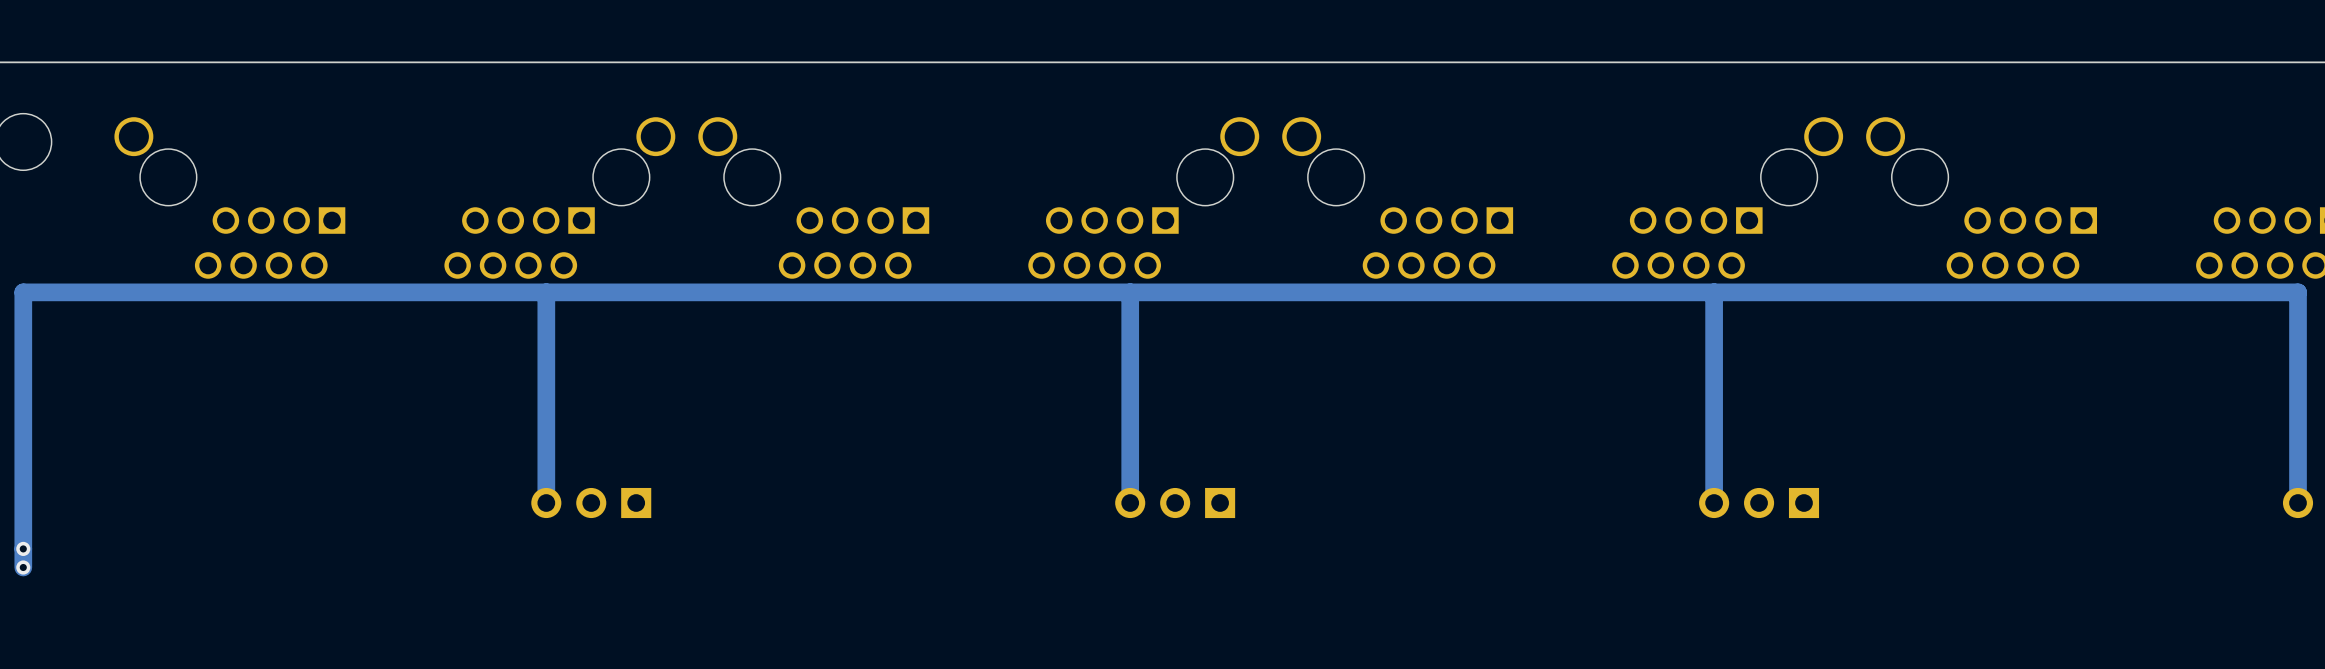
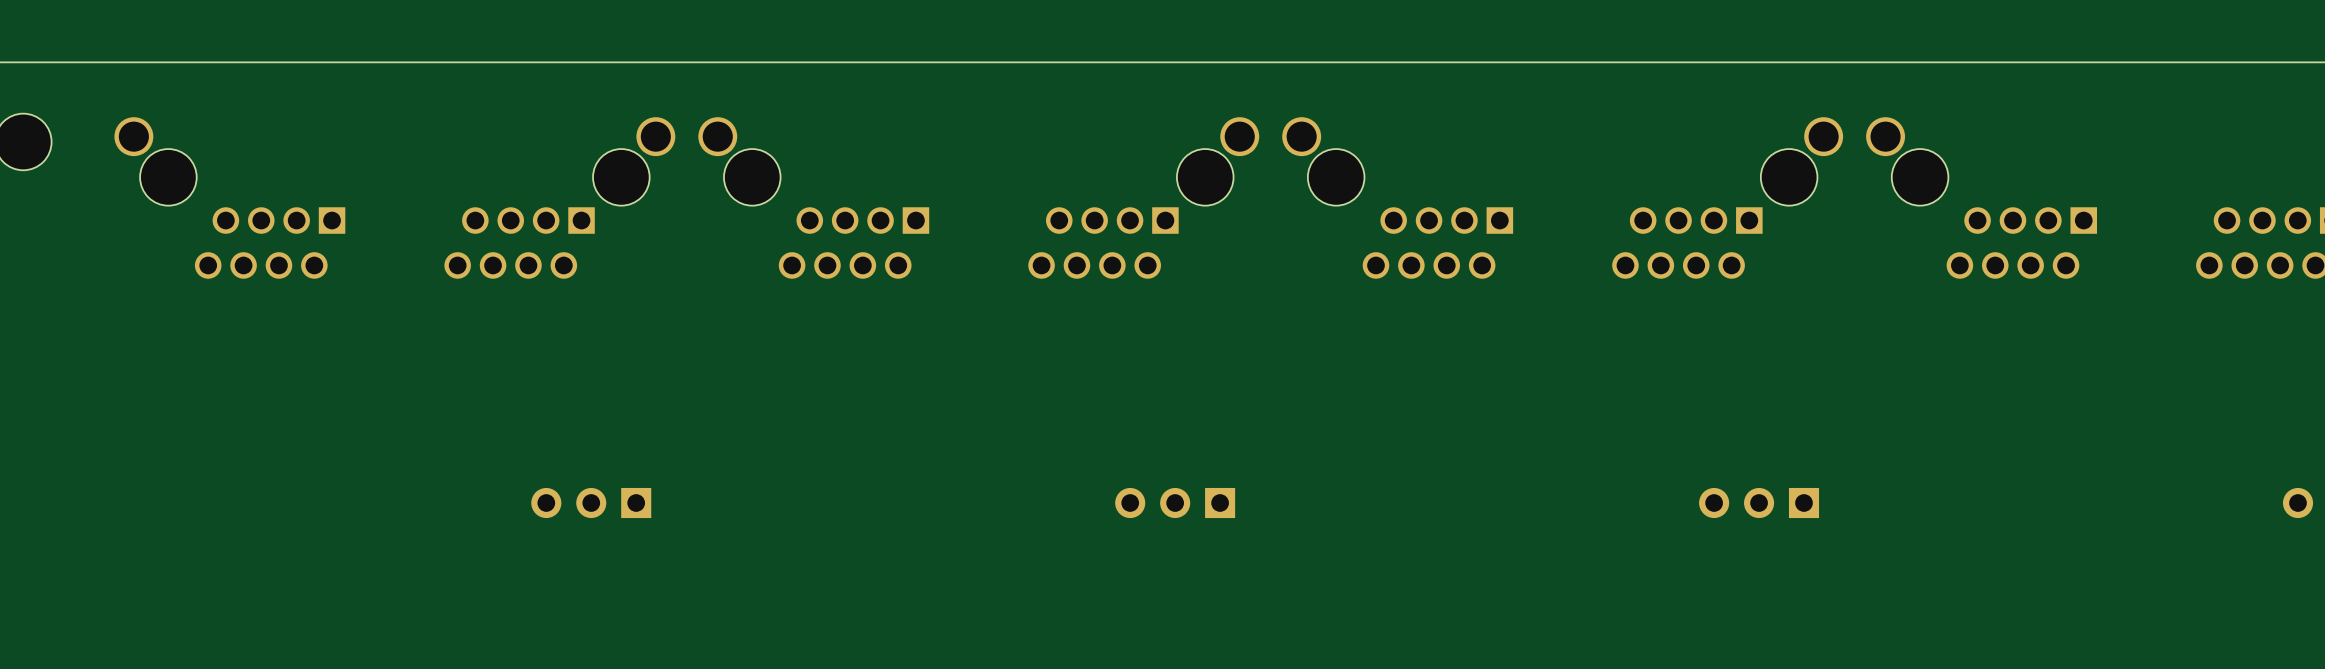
track: (546, 292) (546, 503) -> none
track: (1130, 292) (1130, 503) -> none
track: (1714, 292) (1714, 503) -> none
track: (2298, 503) (2298, 292) (23, 292) (23, 567) -> none
via: (23, 548) -> none
via: (23, 567) -> none

